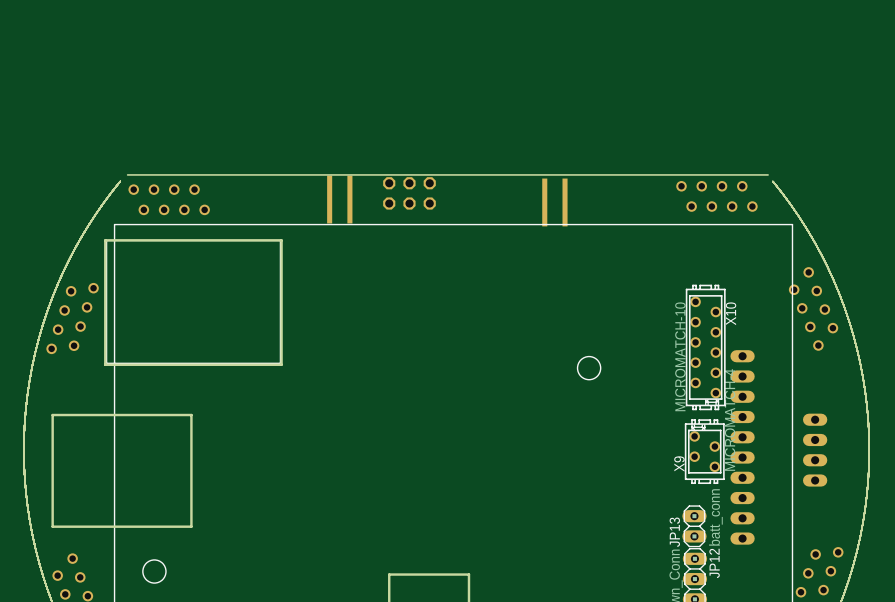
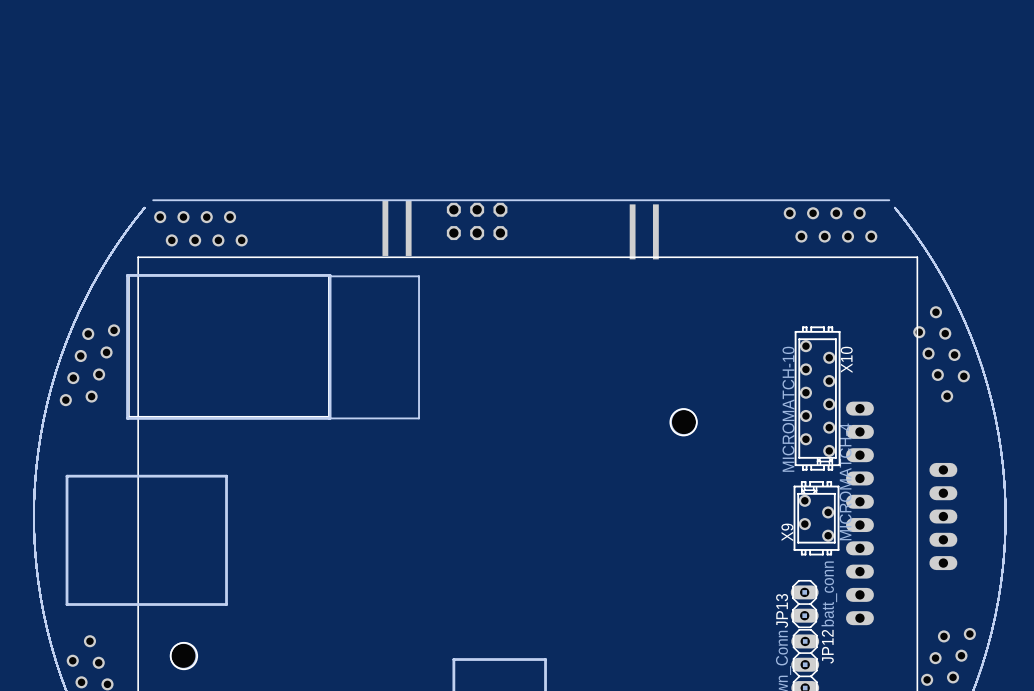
board edge: none -> (330, 276) (419, 276) (419, 418) (329, 418)
part: none -> (683, 422)
part footprint: [802, 413, 828, 487] -> [929, 462, 958, 571]
part: none -> (183, 655)

